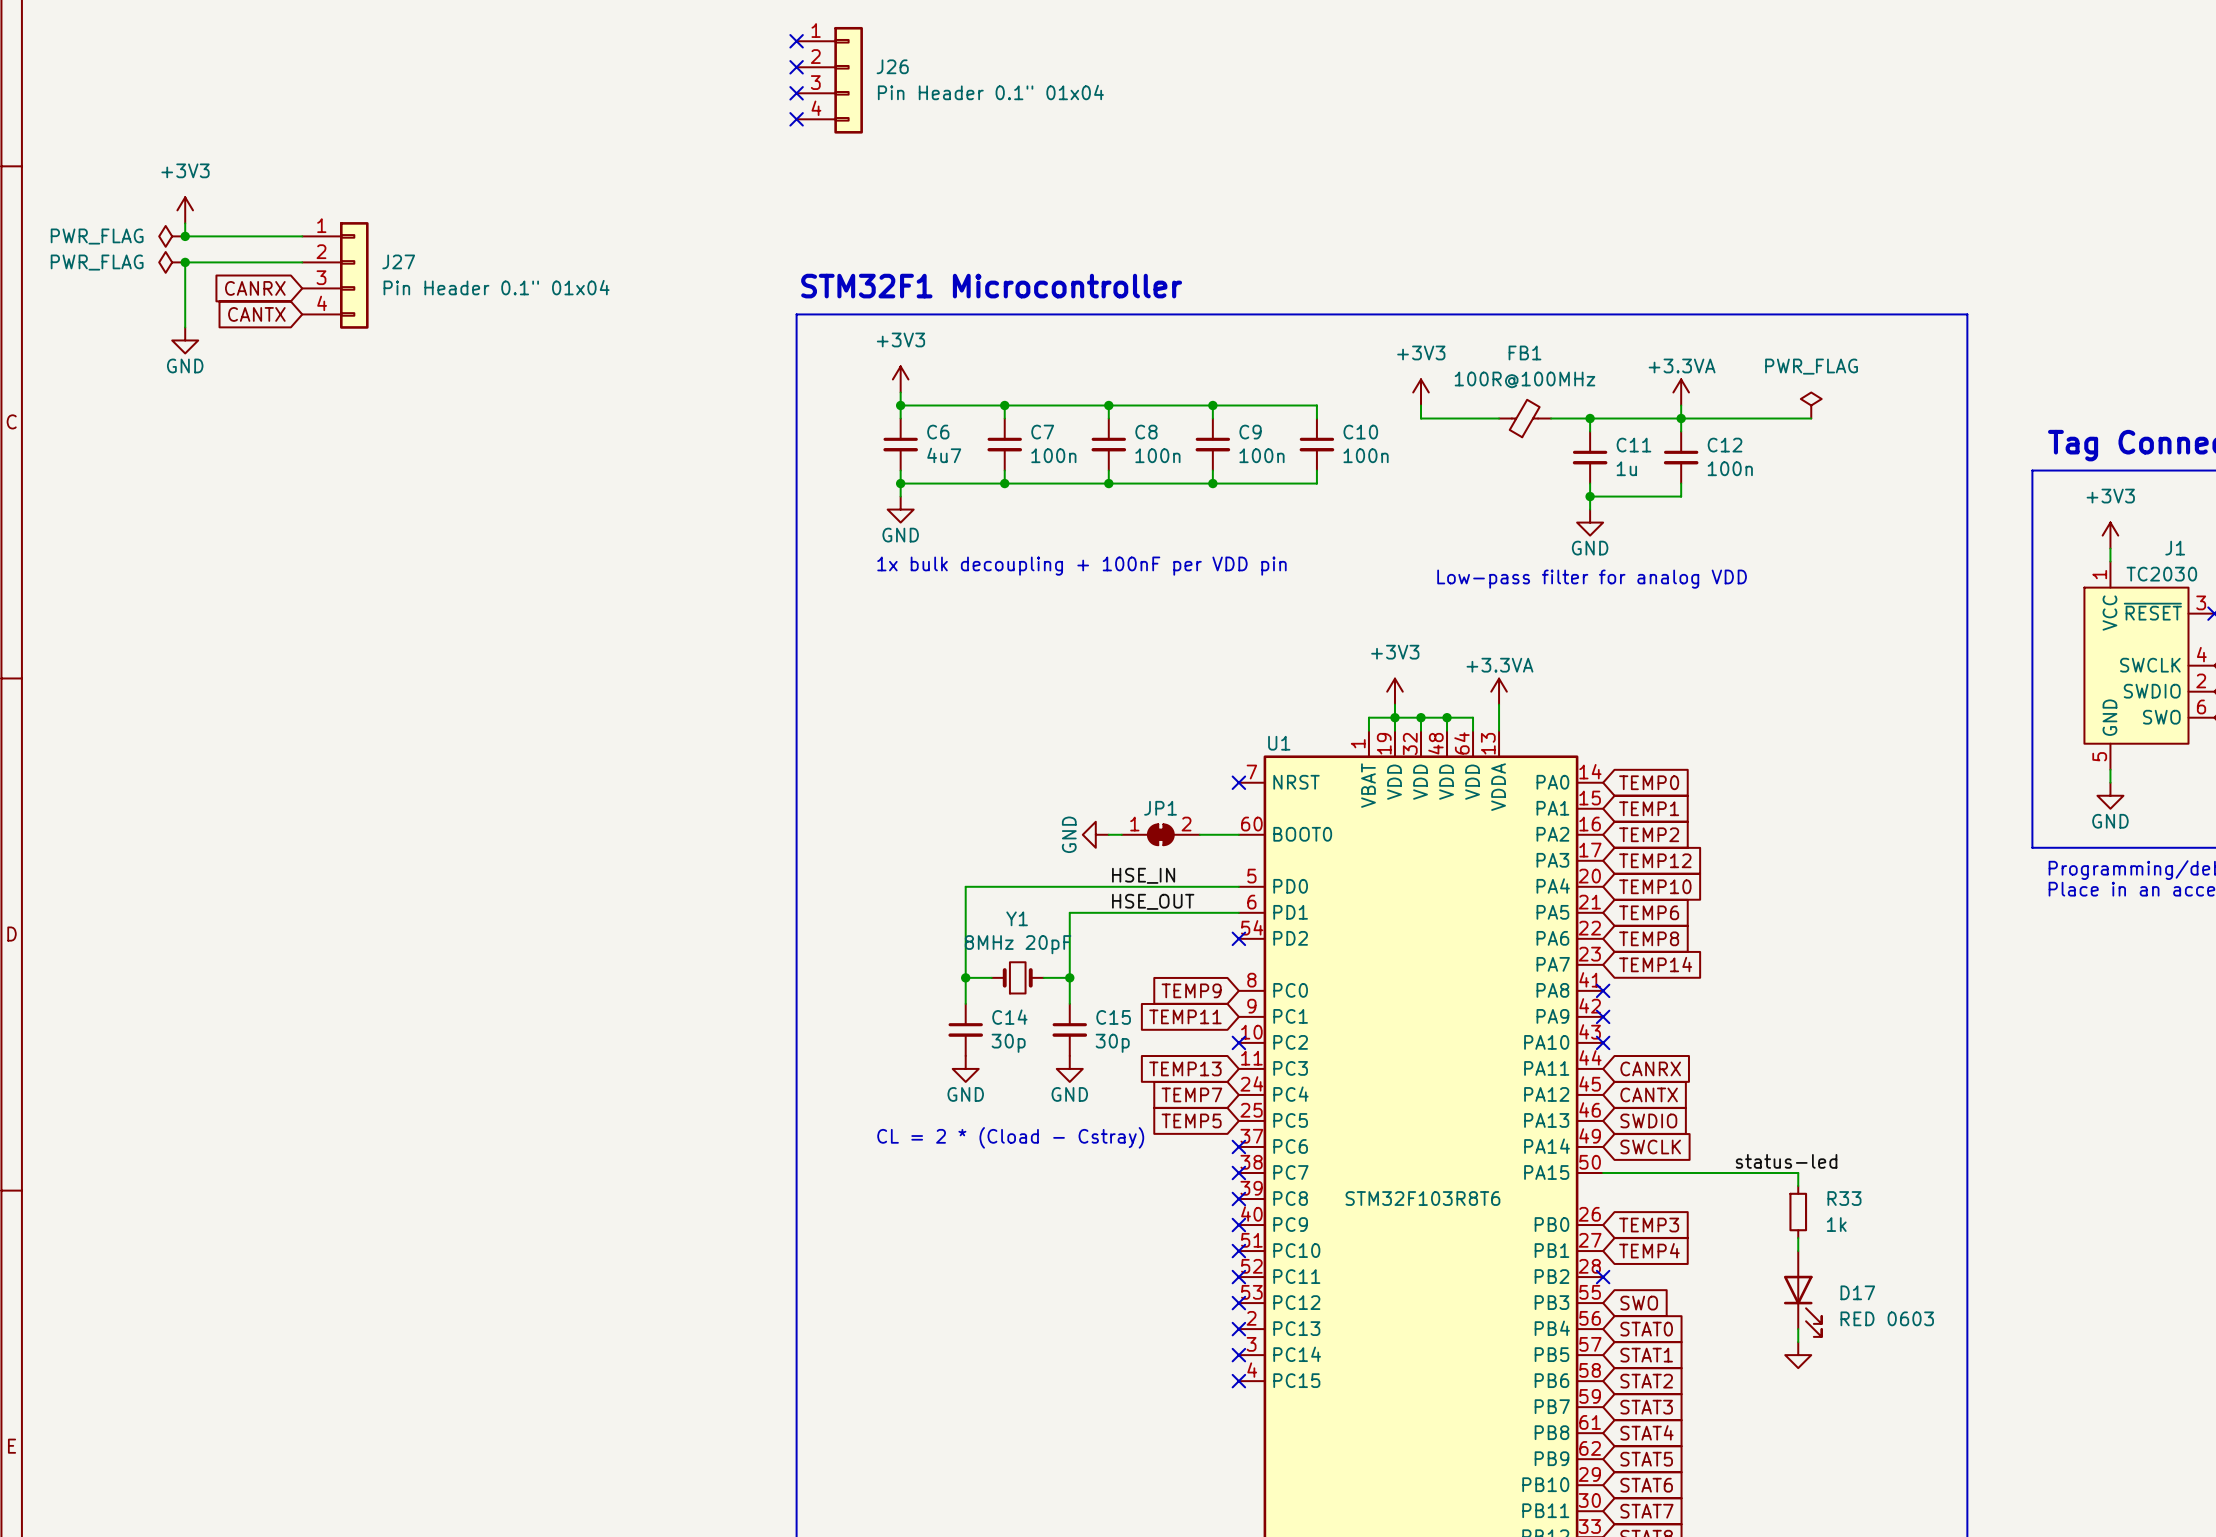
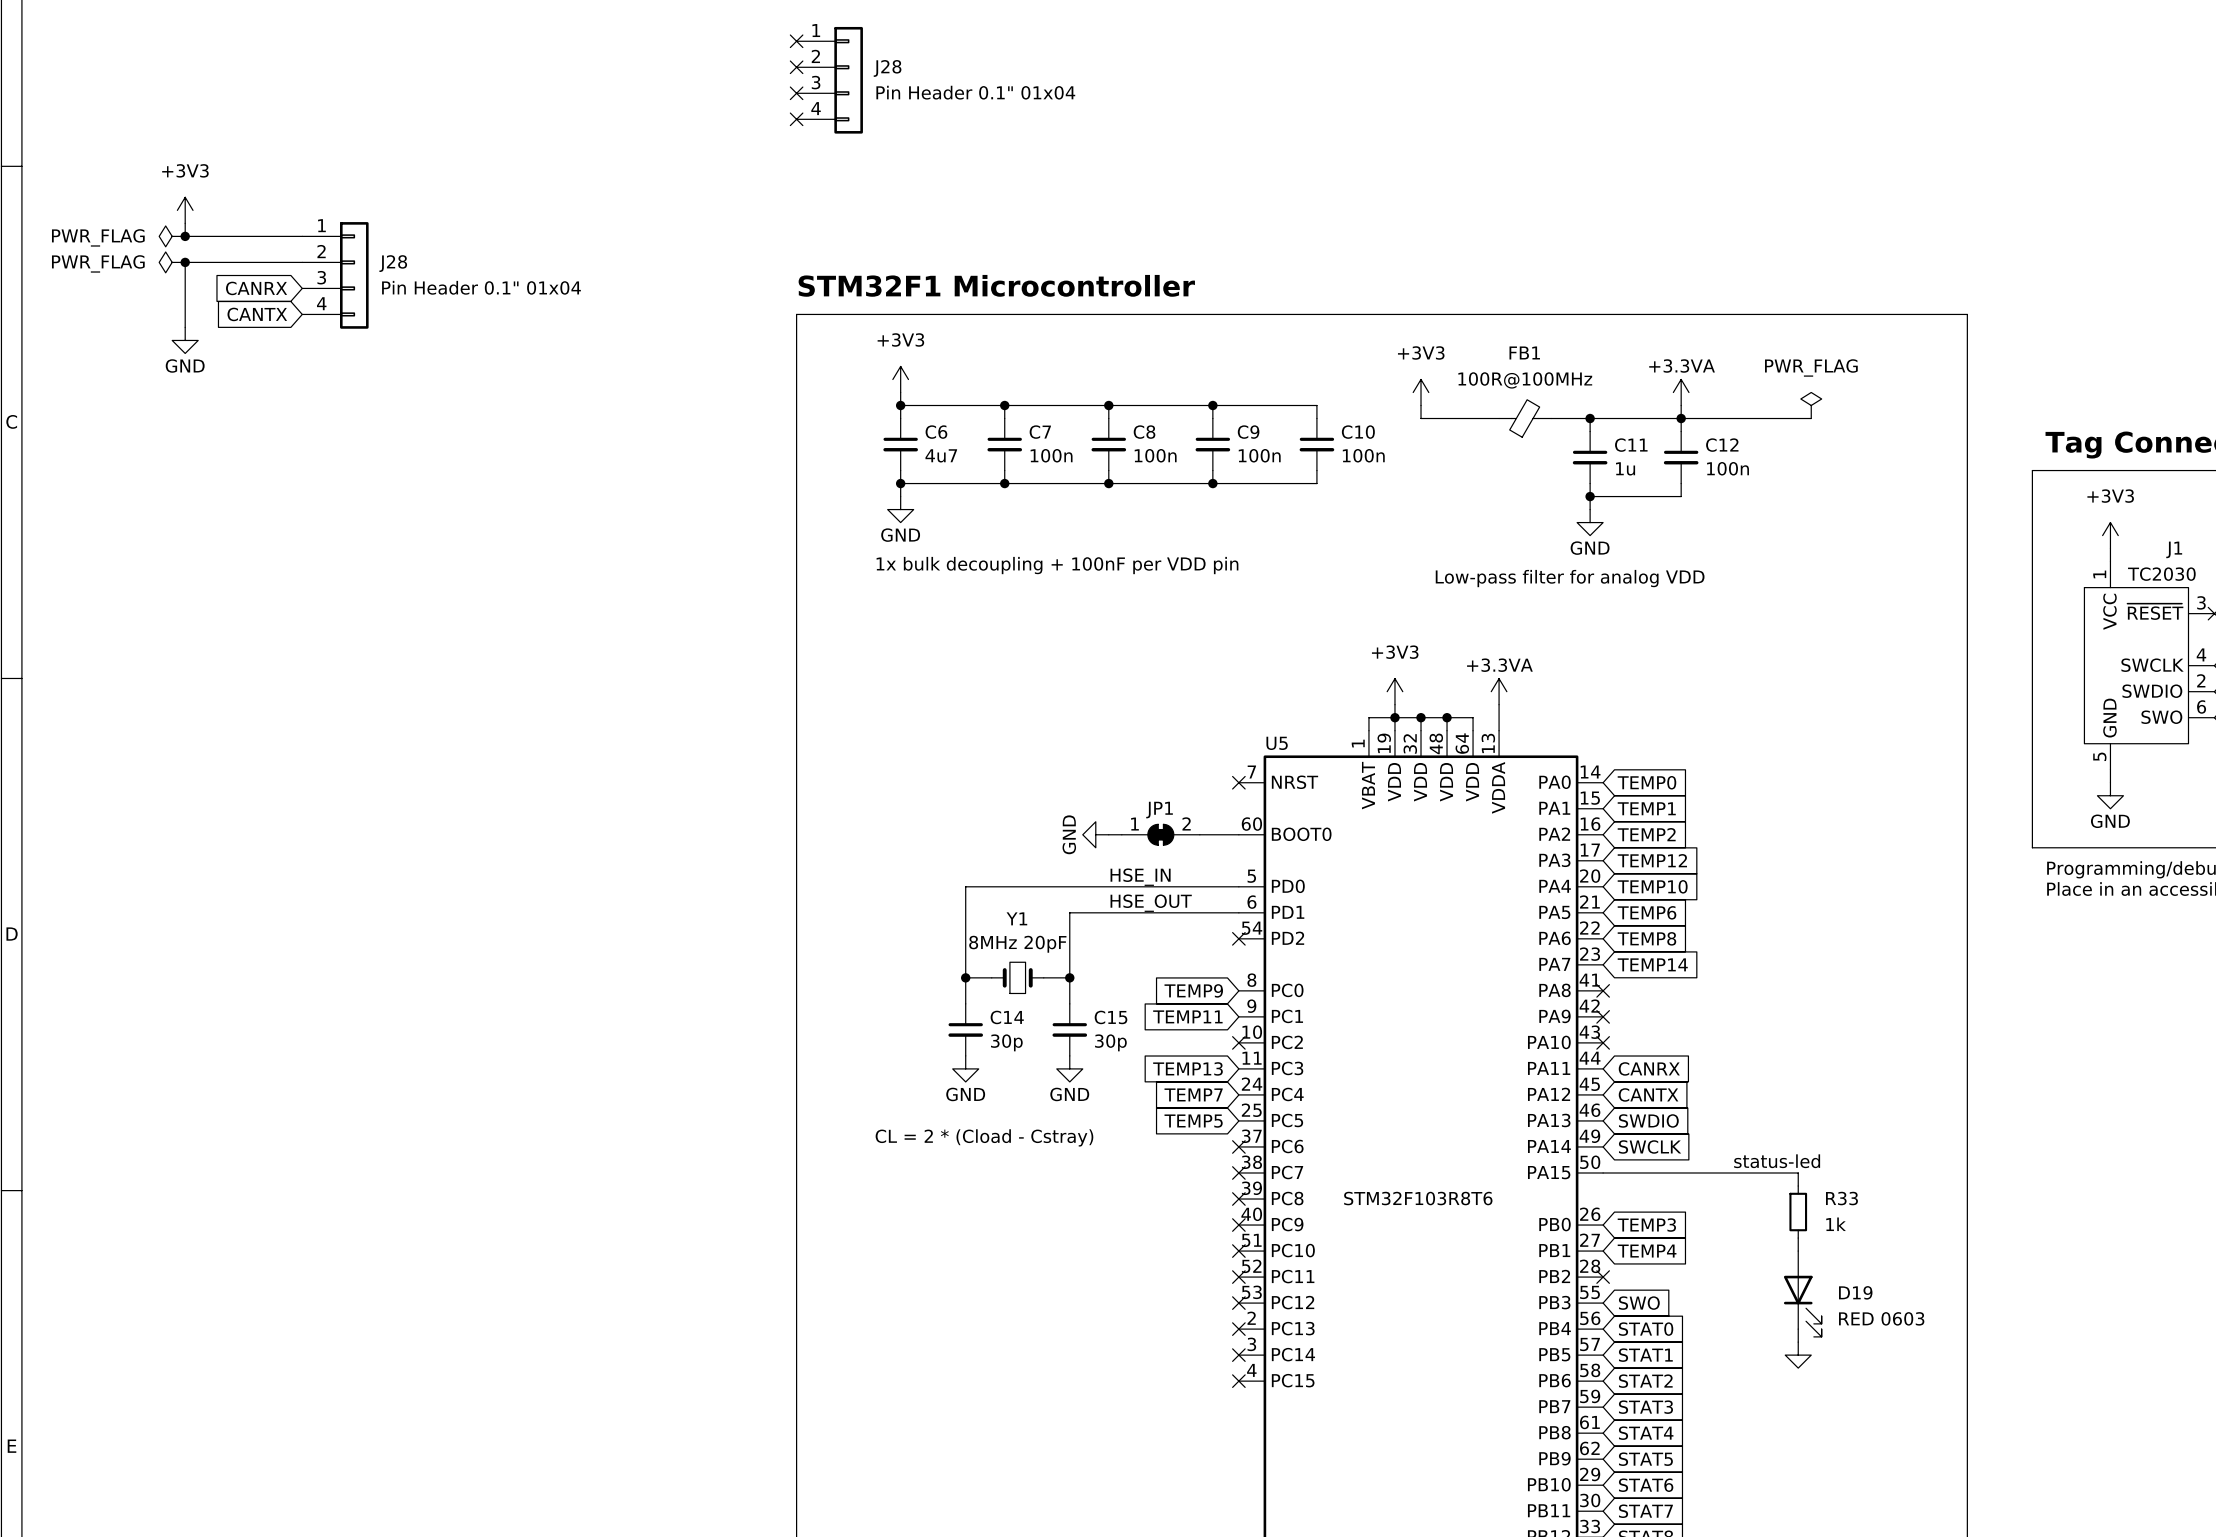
J26 name: J26 (892, 66) -> J28 (887, 68)
J27 name: J27 (398, 261) -> J28 (393, 263)
U1 name: U1 (1279, 743) -> U5 (1277, 743)
D17 name: D17 (1857, 1292) -> D19 (1855, 1292)

